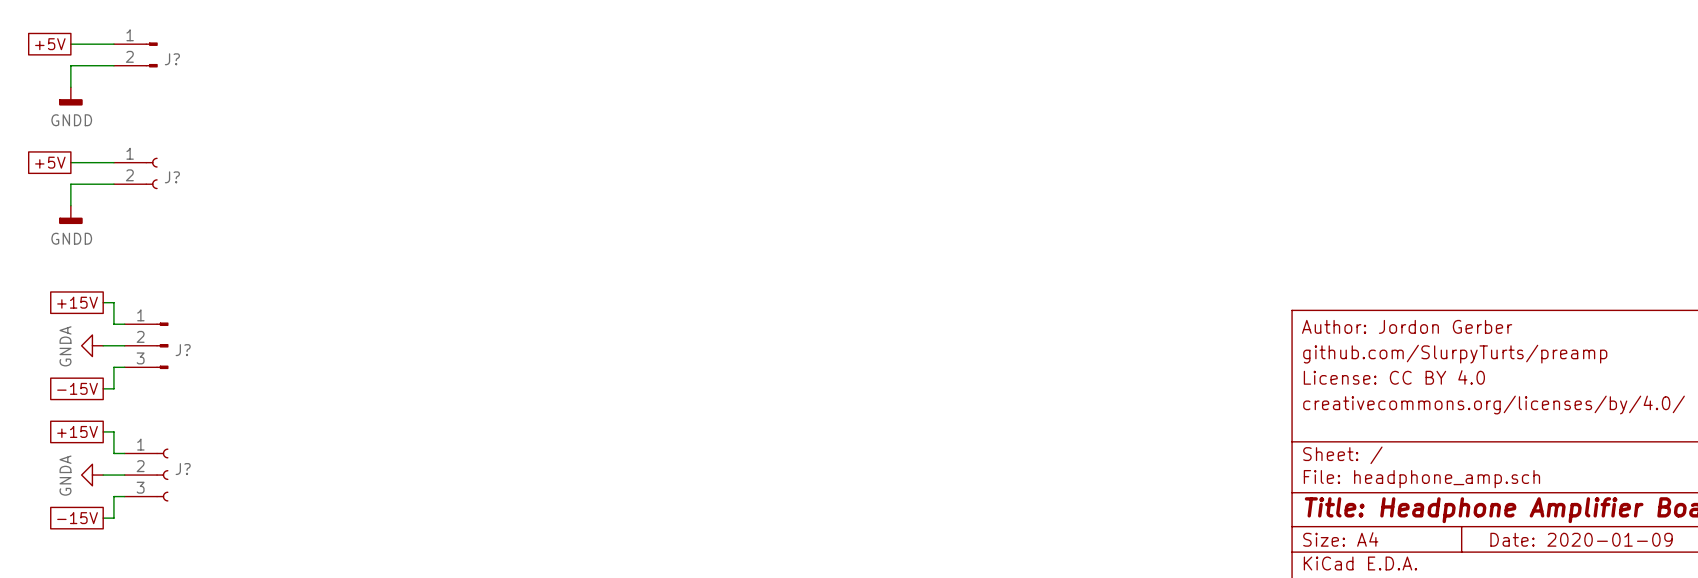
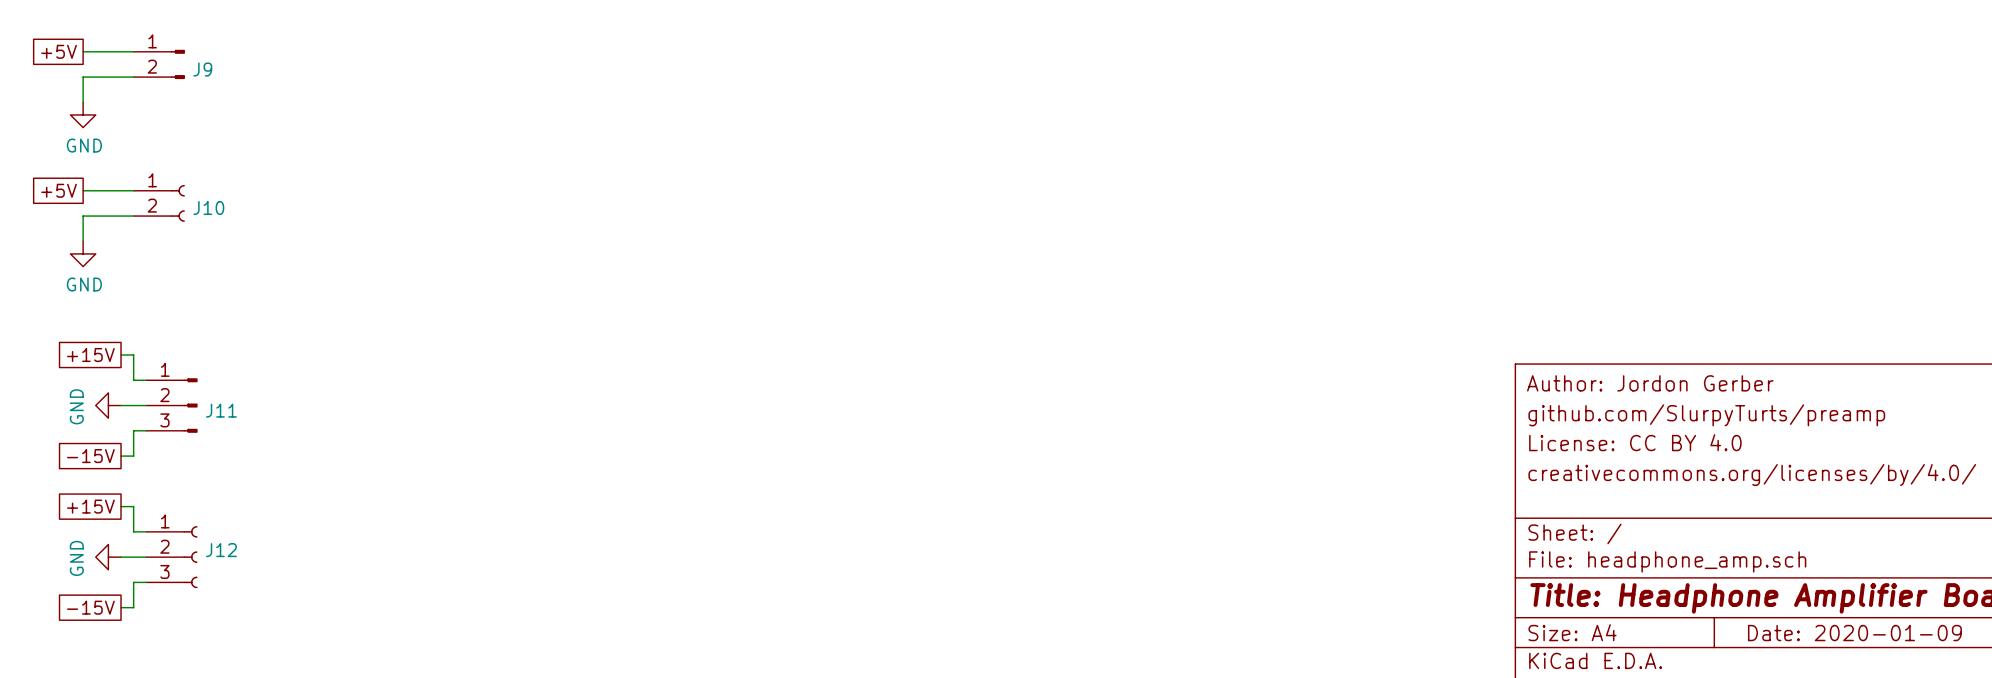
J? name: J? (172, 59) -> J9 (202, 69)
power symbol: GNDD (70, 96) -> GND (83, 114)
J? name: J? (172, 177) -> J10 (208, 207)
power symbol: GNDD (70, 214) -> GND (83, 253)
power symbol: GNDA (92, 345) -> GND (108, 405)
J? name: J? (183, 350) -> J11 (221, 410)
J? name: J? (183, 469) -> J12 (221, 550)
power symbol: GNDA (92, 475) -> GND (108, 557)

